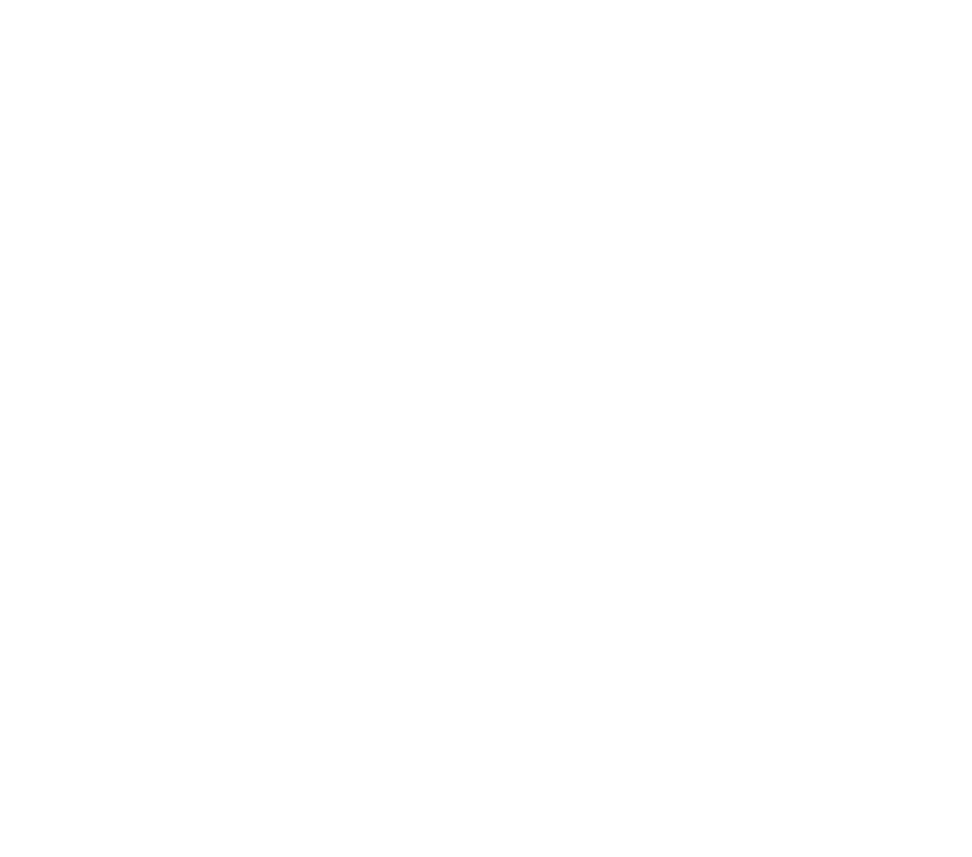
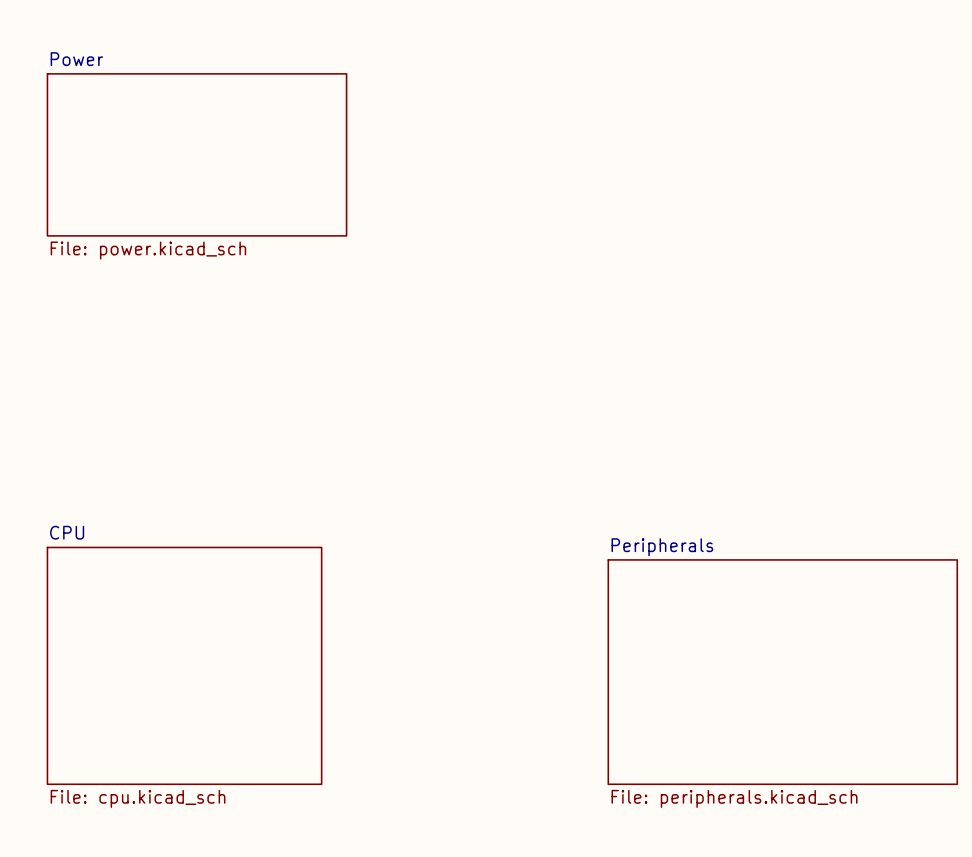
sheet Power: none -> File: power.kicad_sch (197, 154)
sheet CPU: none -> File: cpu.kicad_sch (184, 665)
sheet Peripherals: none -> File: peripherals.kicad_sch (782, 672)

